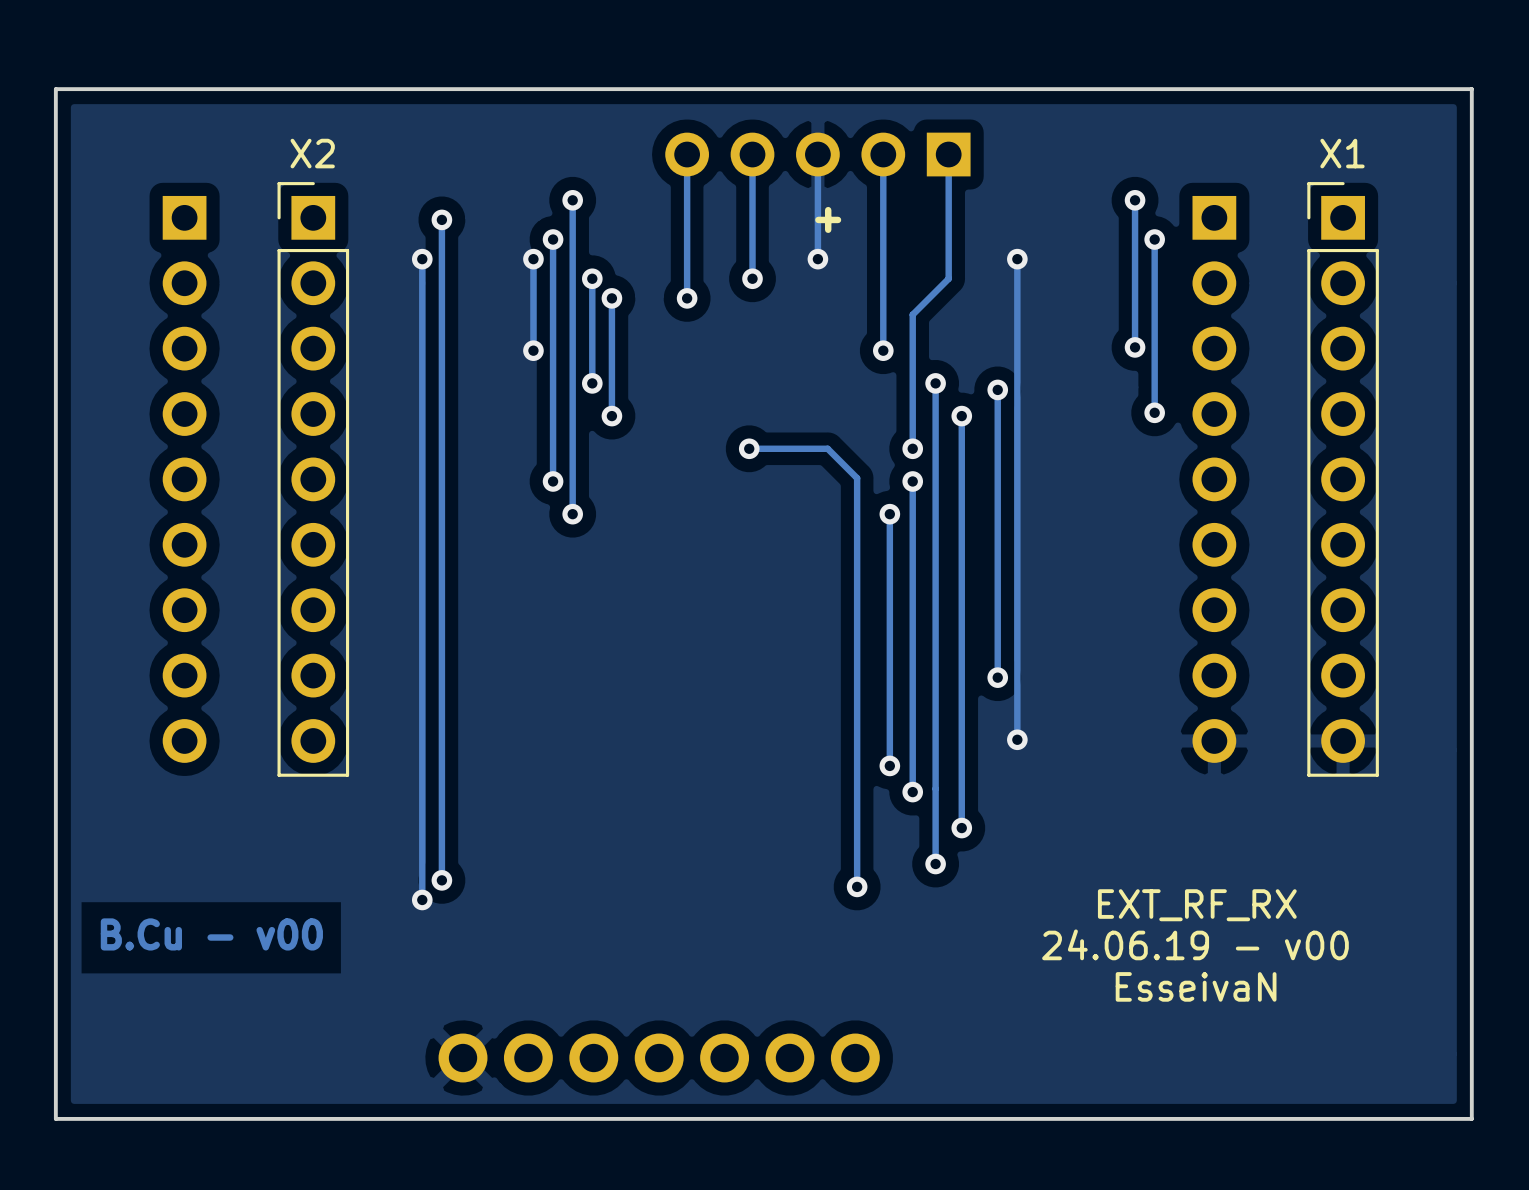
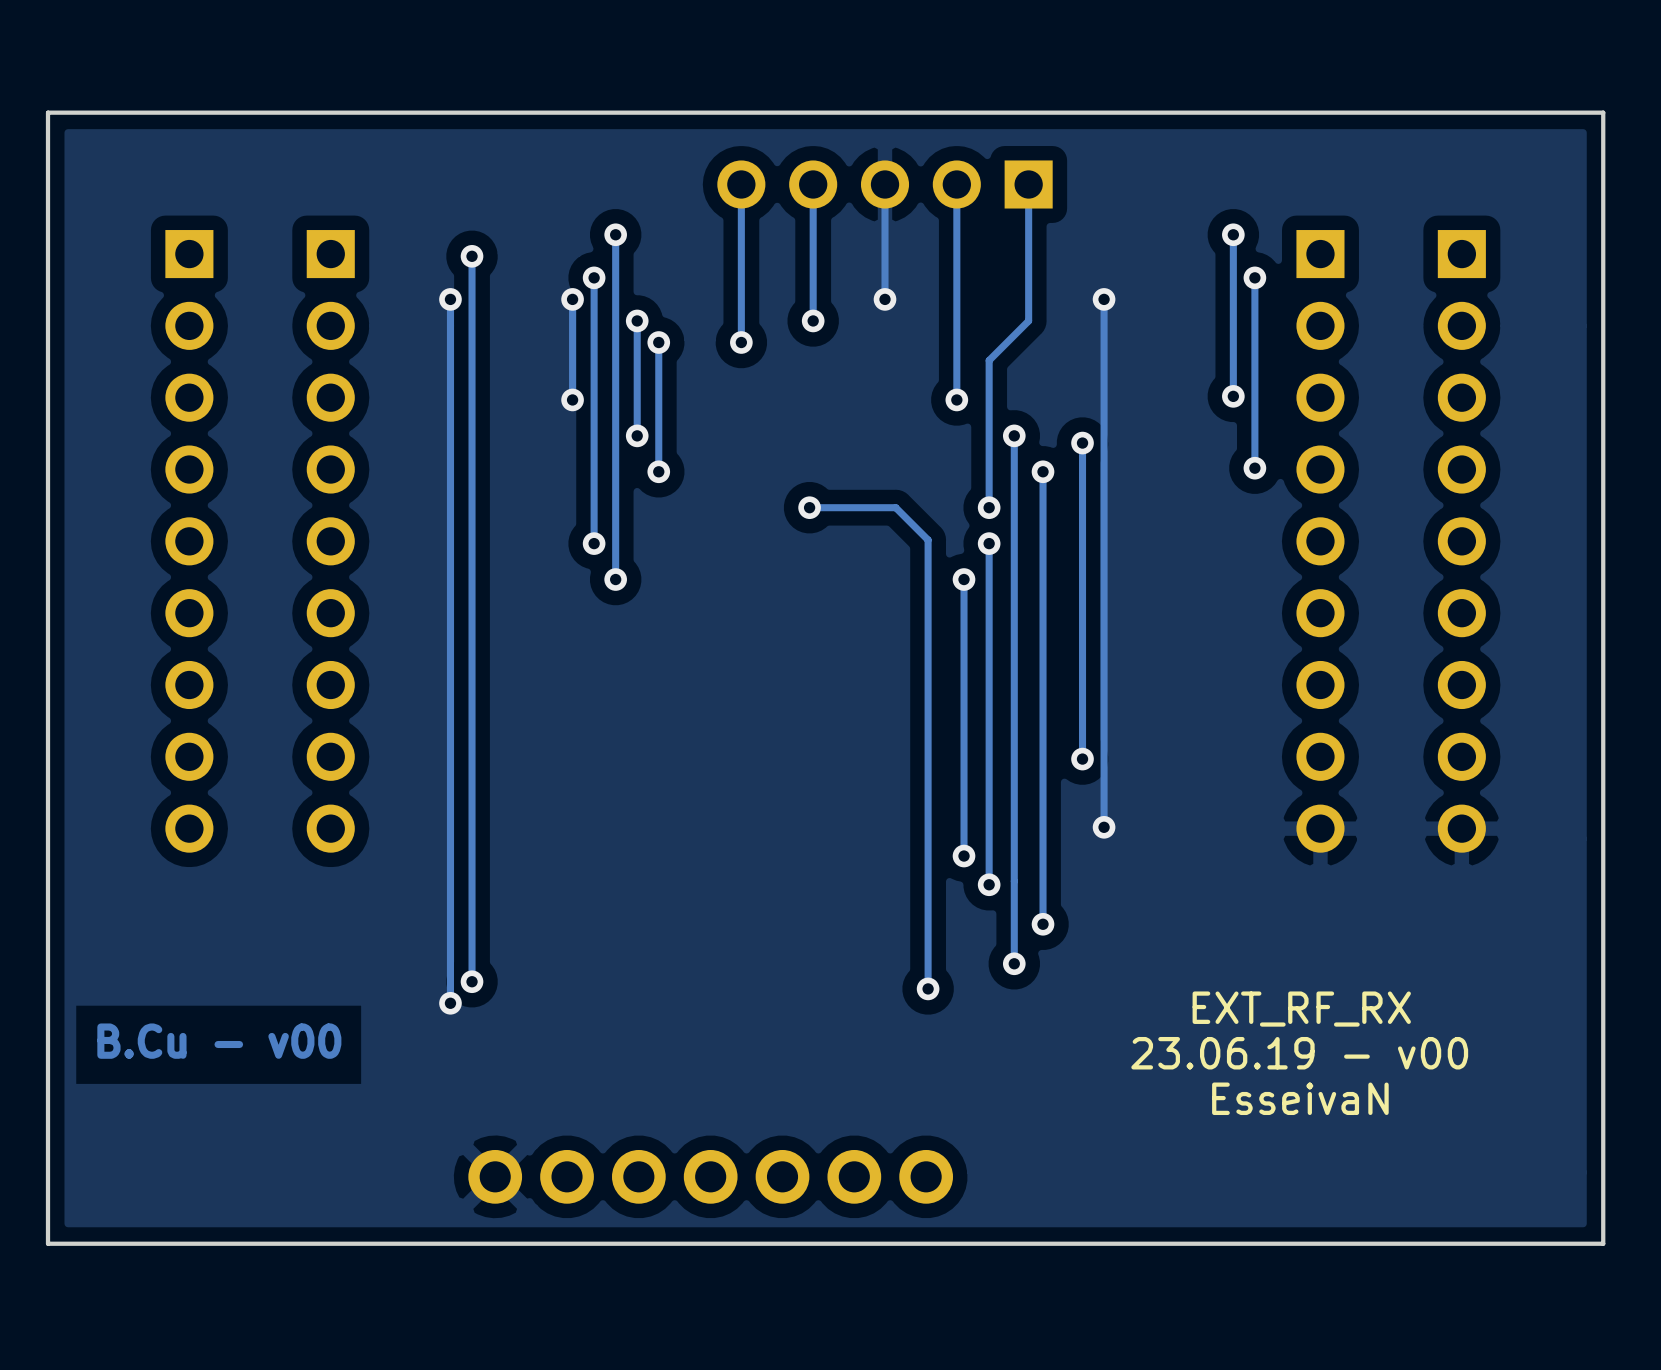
text: + (828, 219) -> none
X2 side: bottom (313, 479) -> top (330, 541)
X1 side: bottom (1343, 479) -> top (1461, 541)
text: 24.06.19 - v00 (1195, 944) -> 23.06.19 - v00 (1299, 1053)

